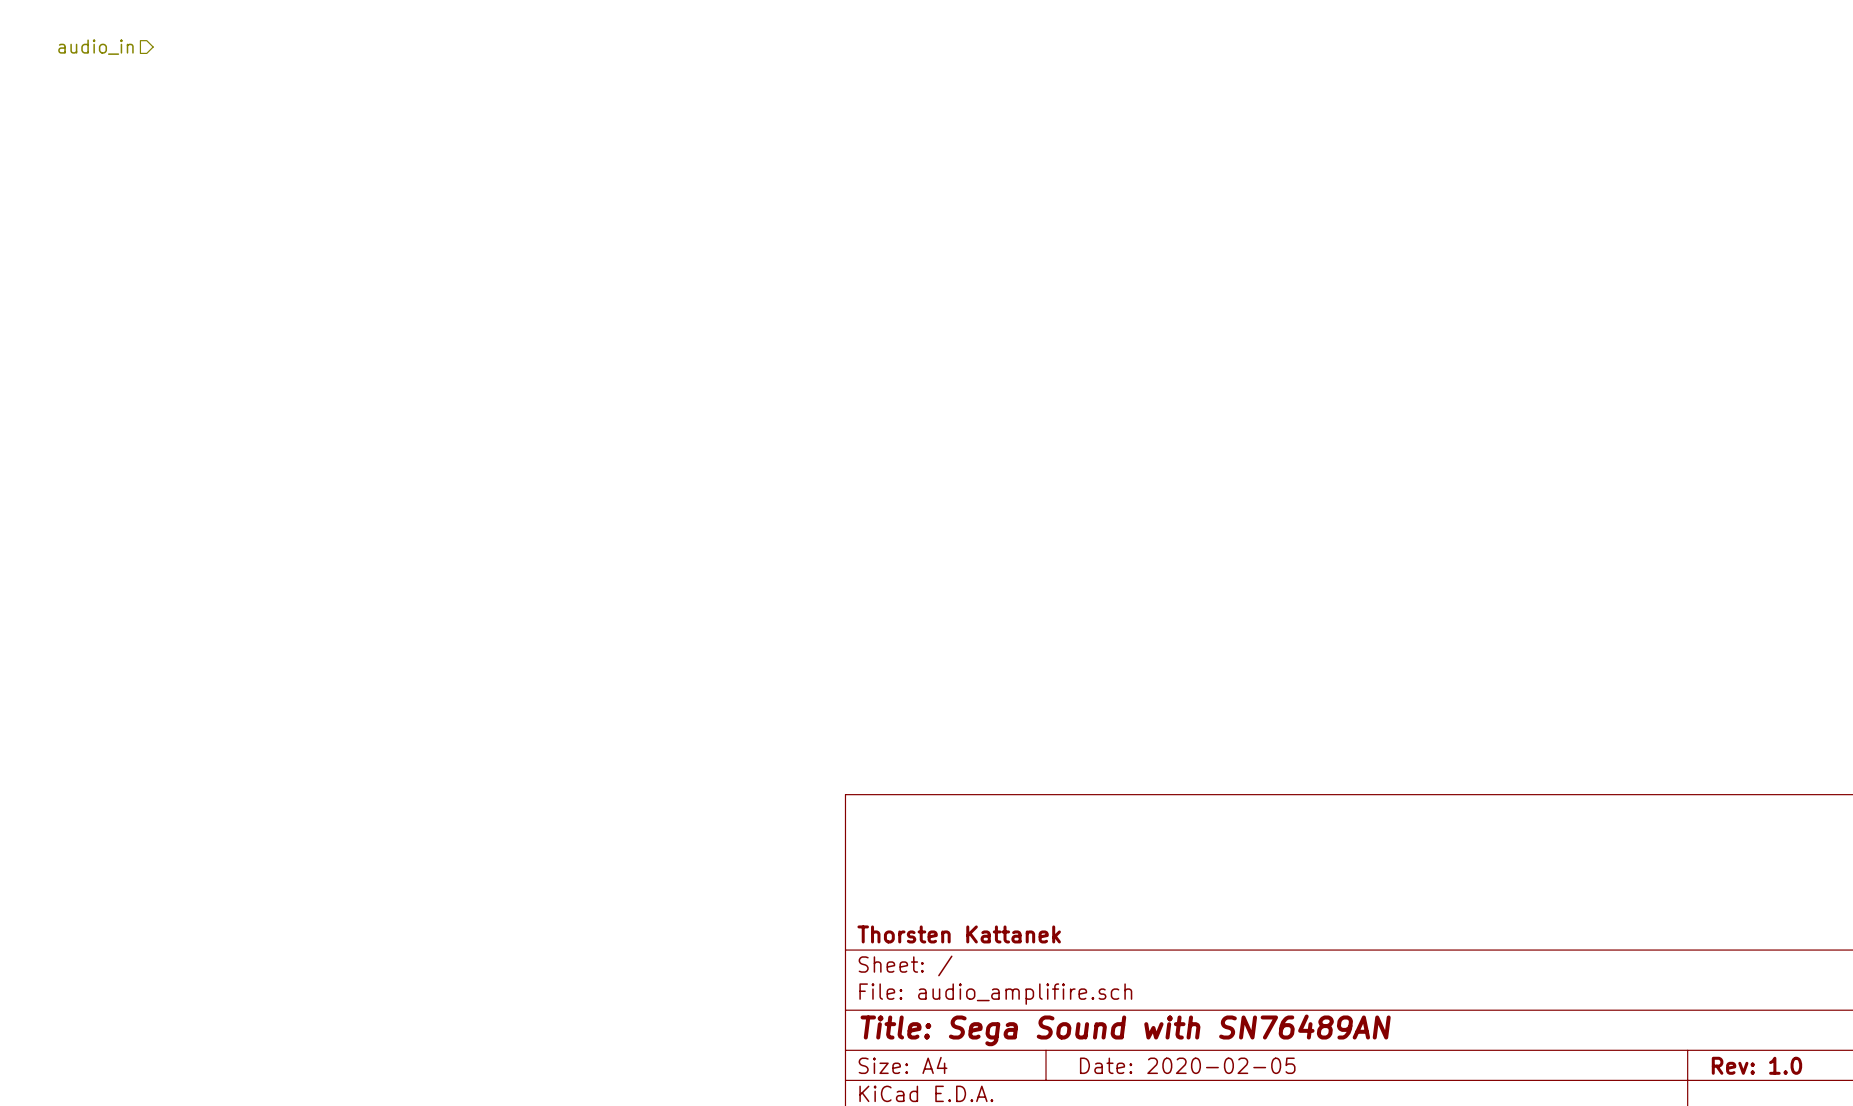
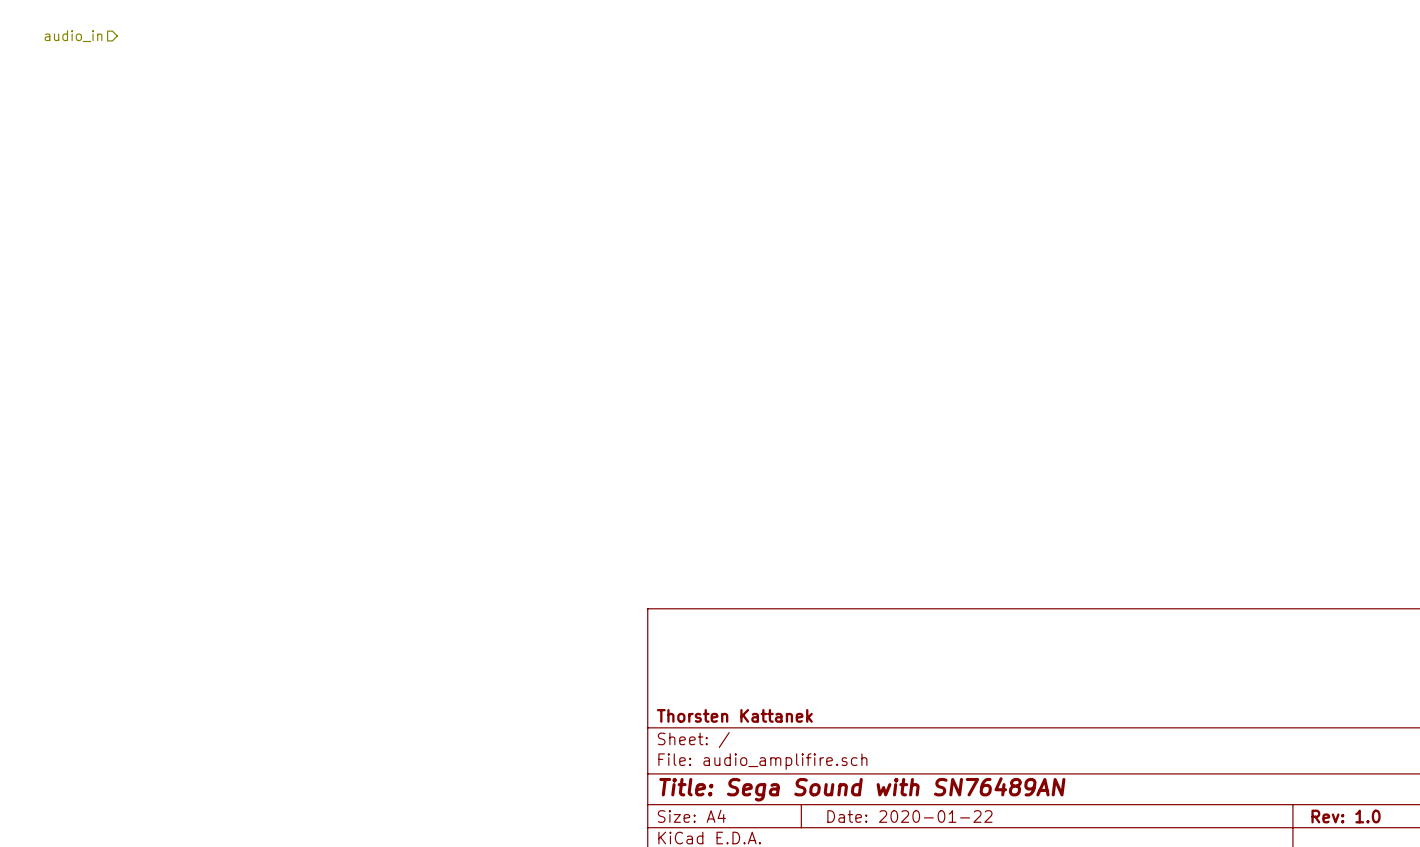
title block: Date: 2020-02-05 (1187, 1065) -> Date: 2020-01-22 (909, 816)

